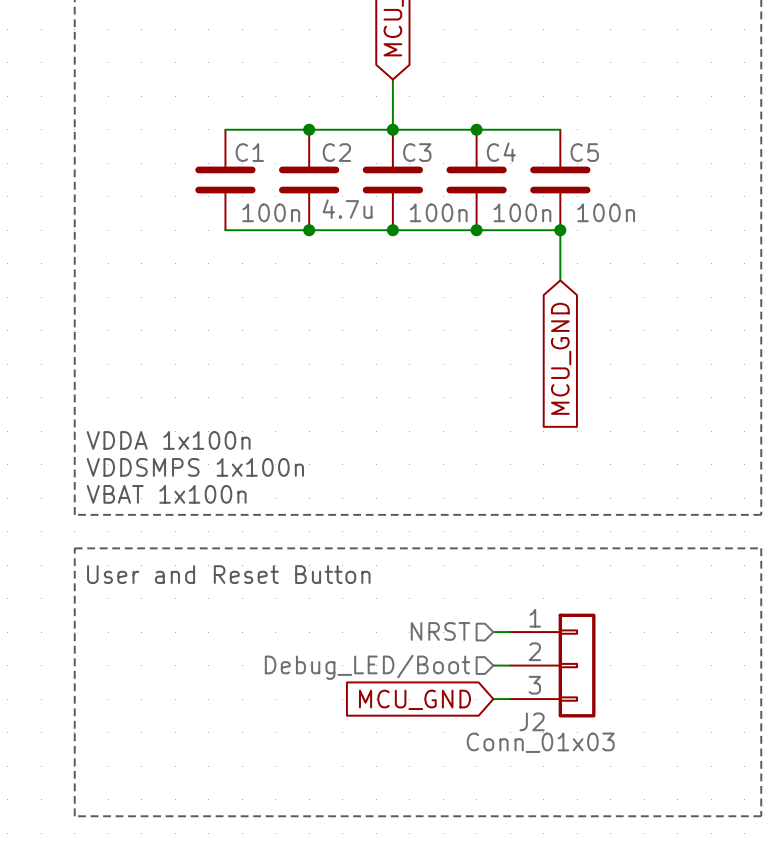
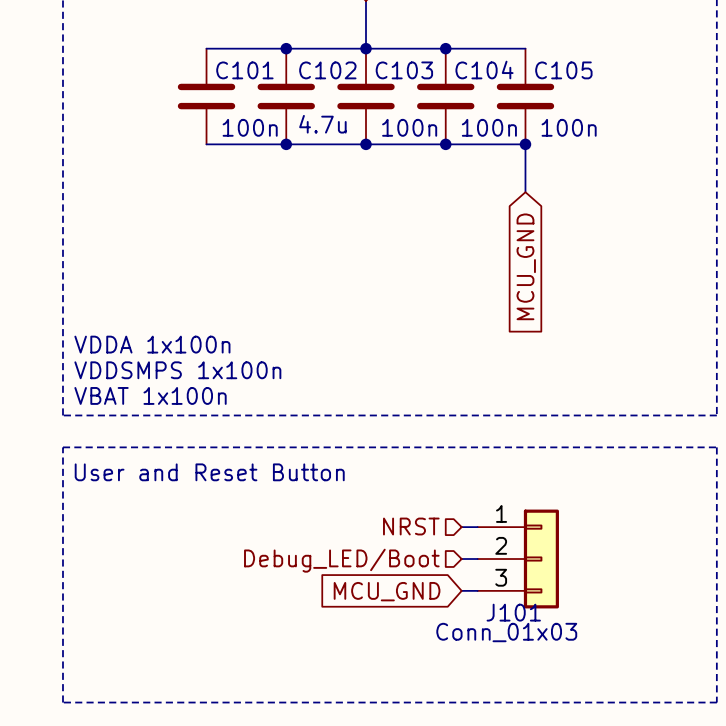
C1 name: C1 (249, 152) -> C101 (244, 70)
C2 name: C2 (336, 152) -> C102 (327, 70)
C3 name: C3 (417, 152) -> C103 (404, 70)
C4 name: C4 (501, 152) -> C104 (484, 70)
C5 name: C5 (584, 152) -> C105 (563, 70)
J2 name: J2 (532, 721) -> J101 (513, 612)

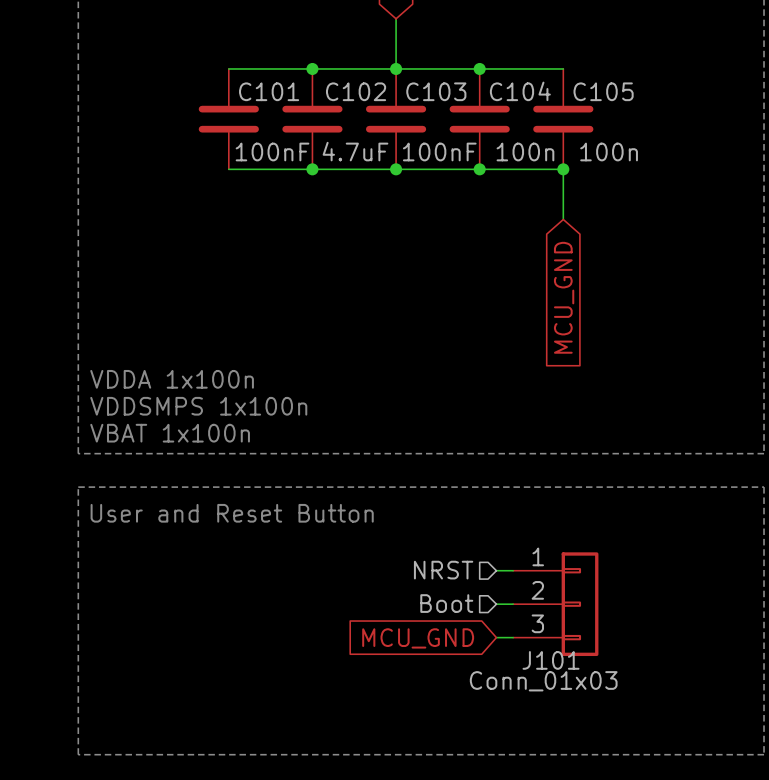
C102 value: 4.7u (322, 124) -> 4.7uF (355, 151)
C101 value: 100n (250, 127) -> 100nF (272, 151)
C103 value: 100n (409, 127) -> 100nF (439, 151)
hierarchical label: Debug_LED/Boot (341, 560) -> Boot (446, 603)

